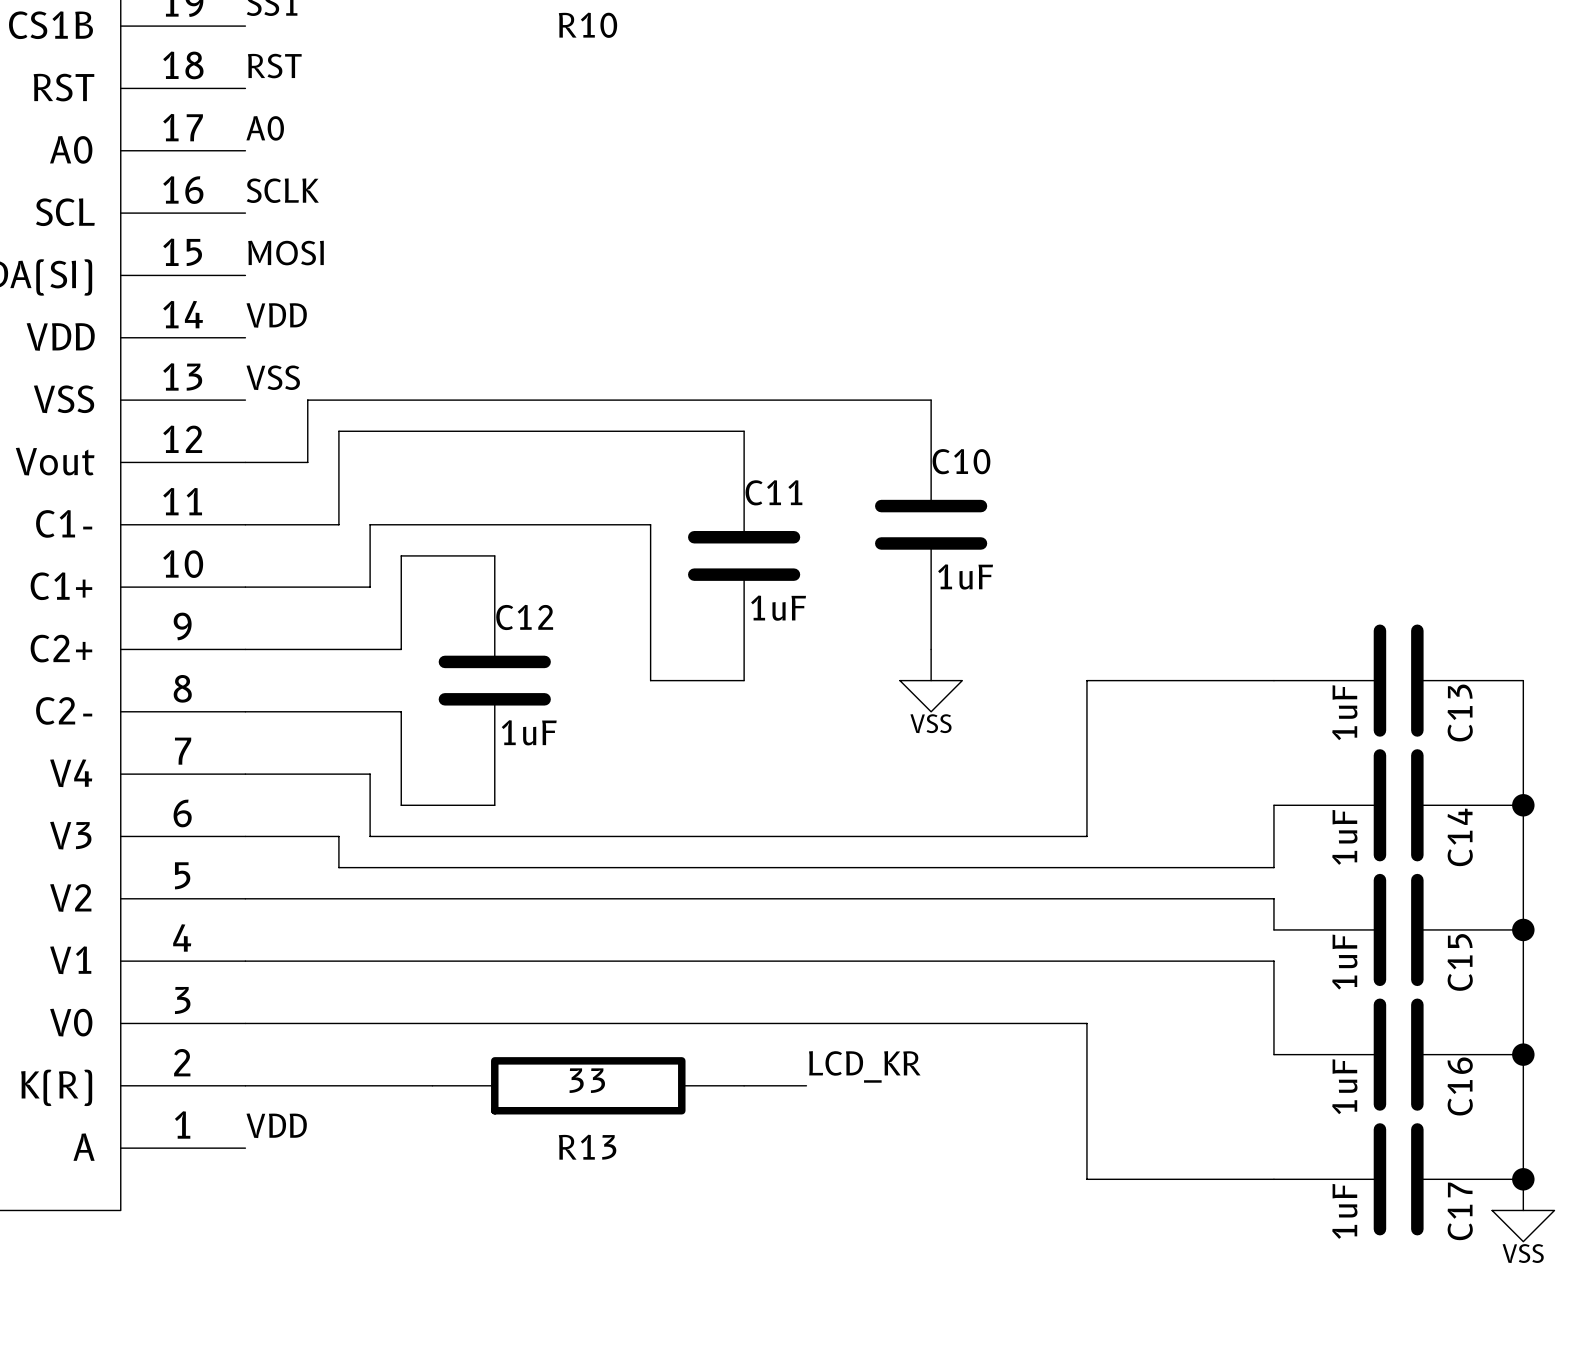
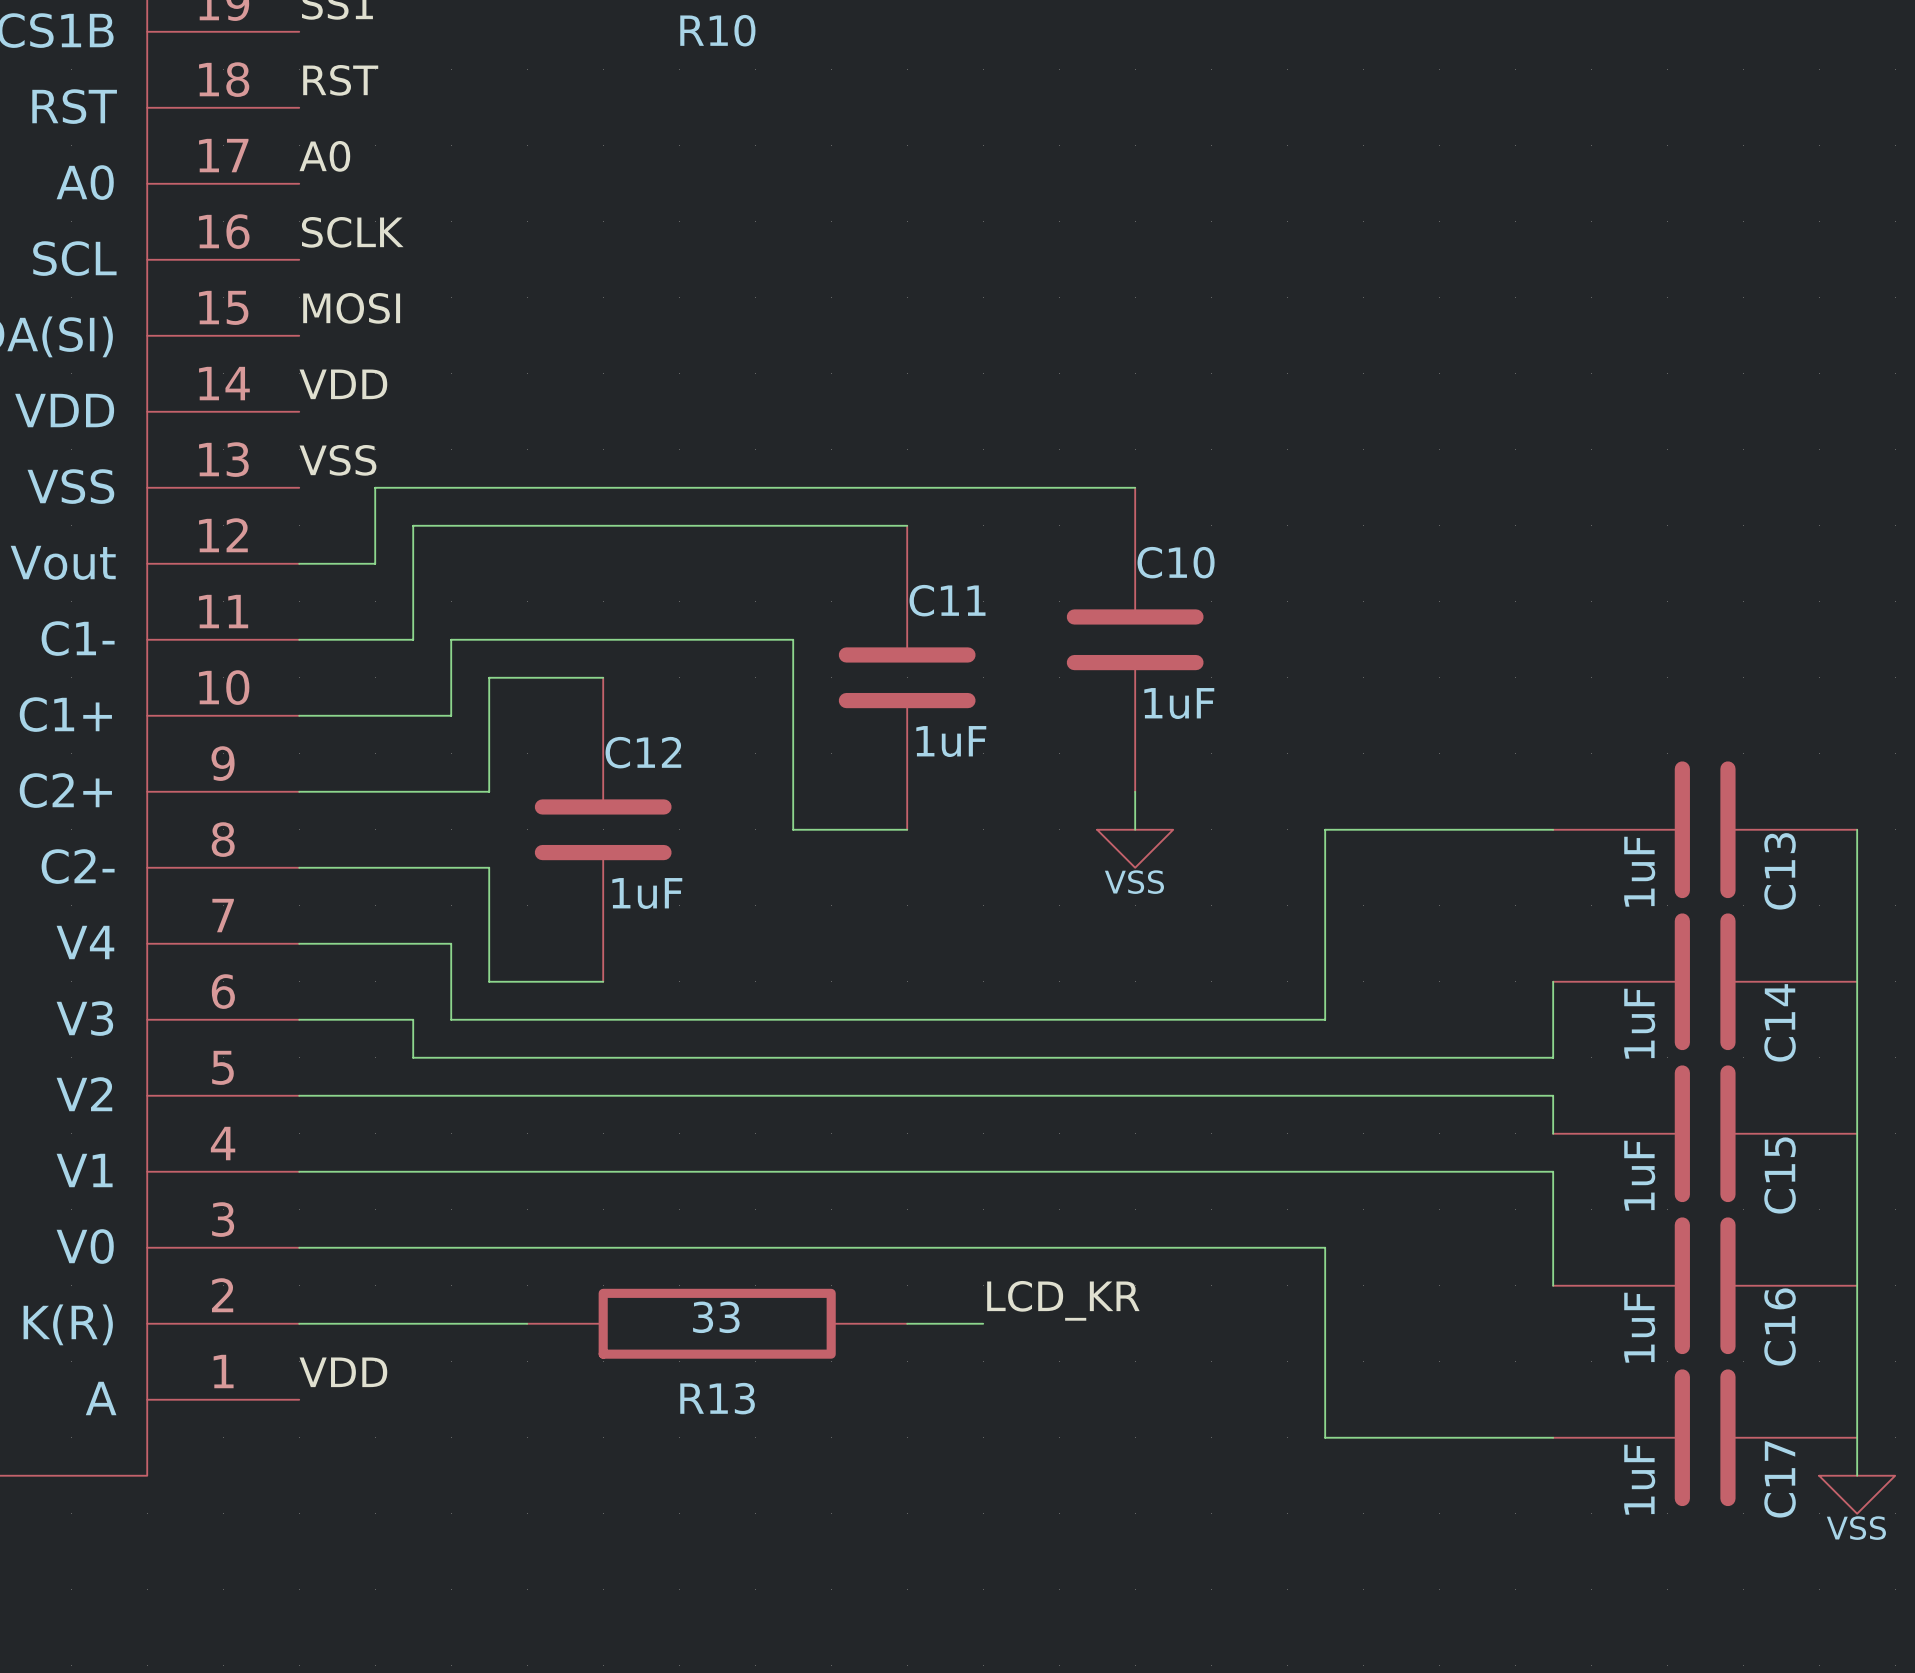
junction: (1523, 805) -> none
junction: (1523, 929) -> none
junction: (1523, 1054) -> none
junction: (1523, 1179) -> none

